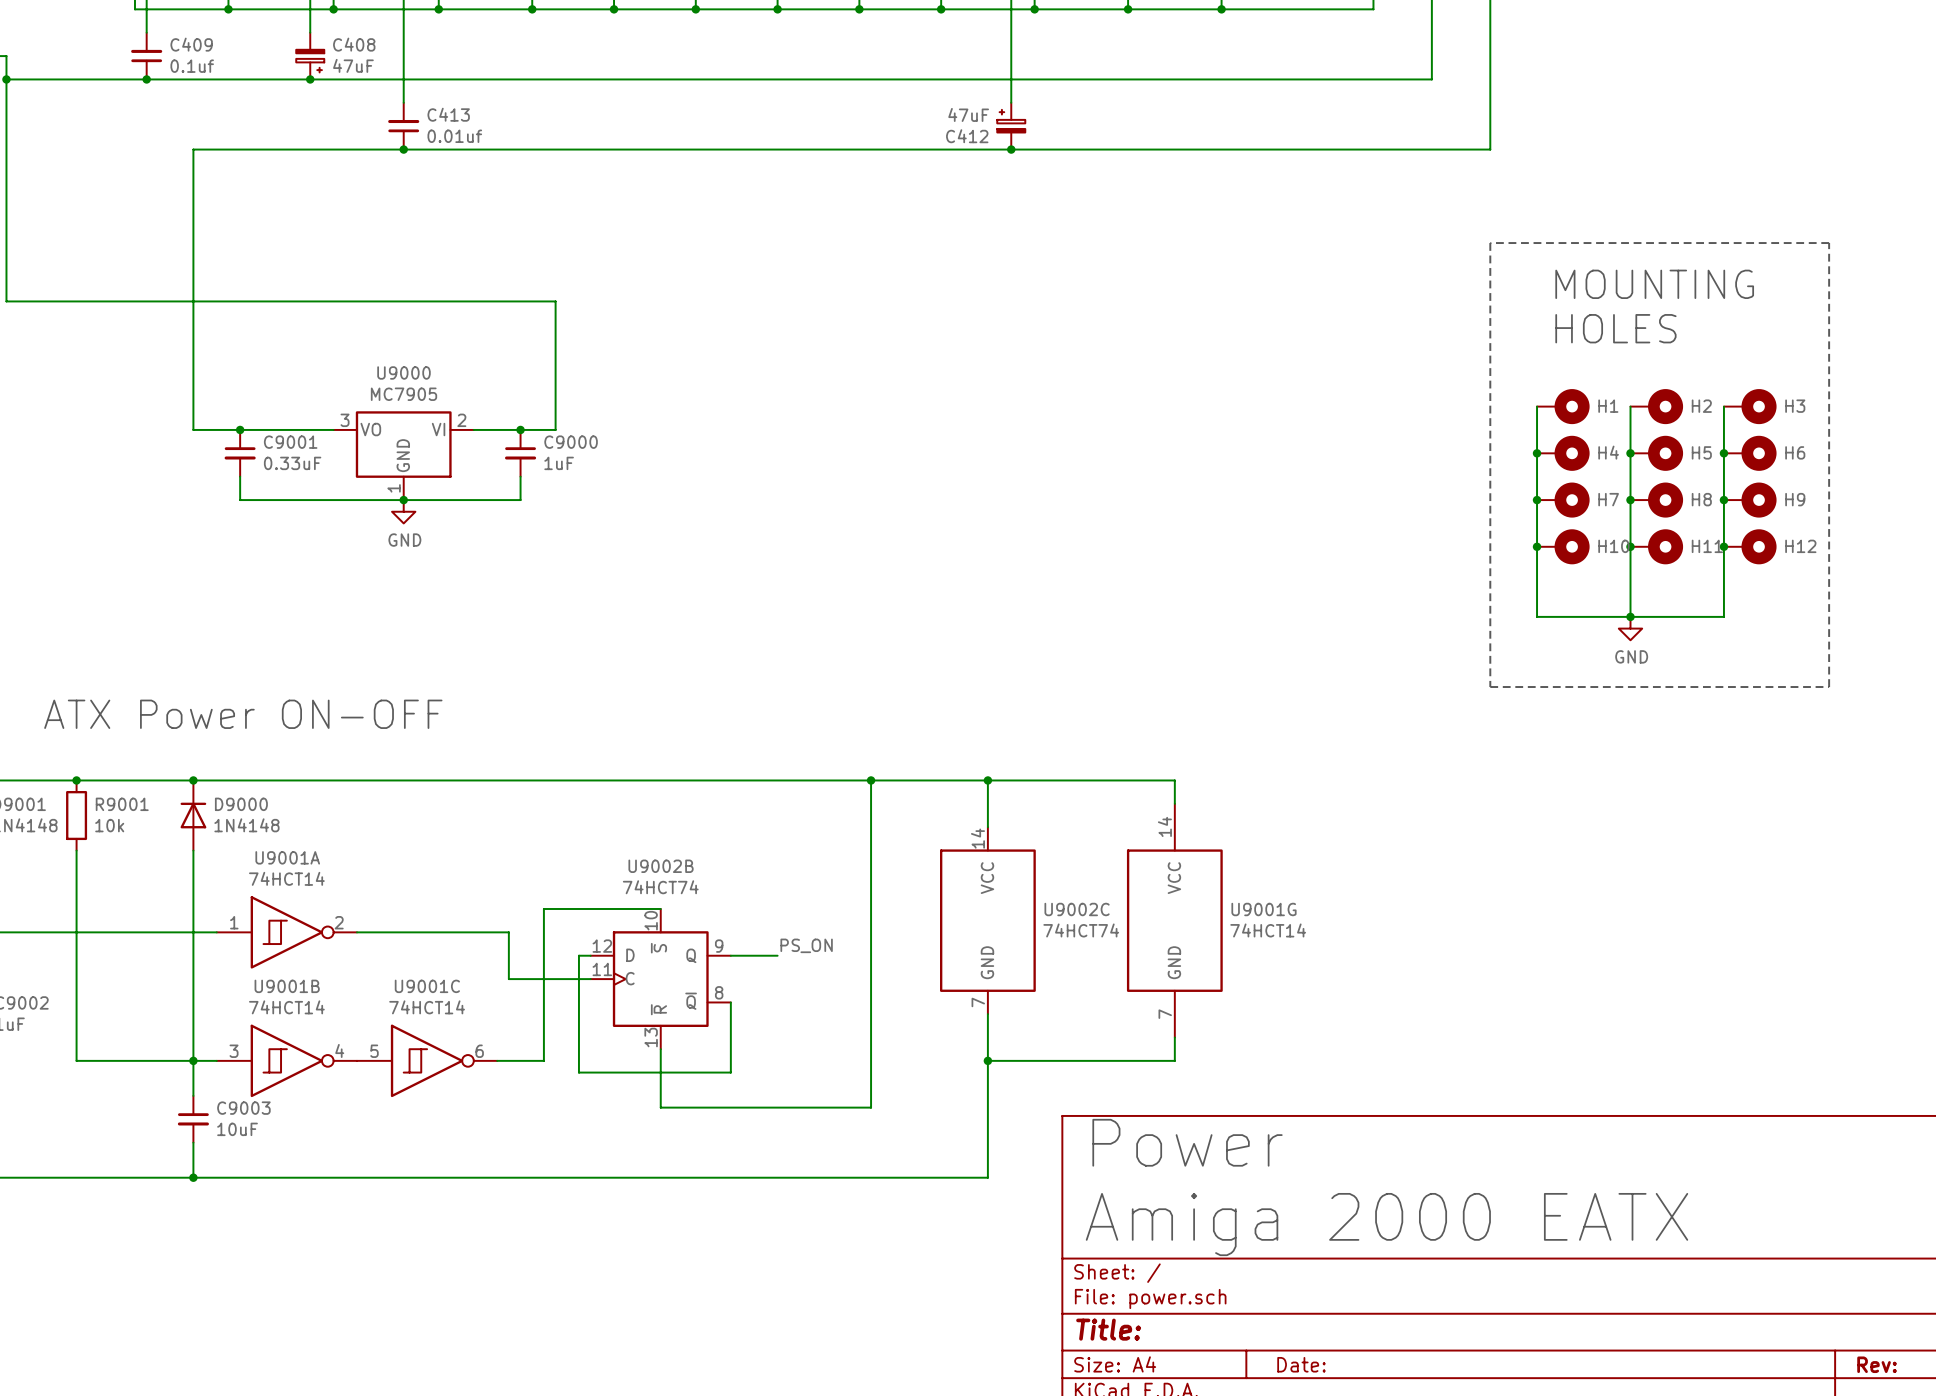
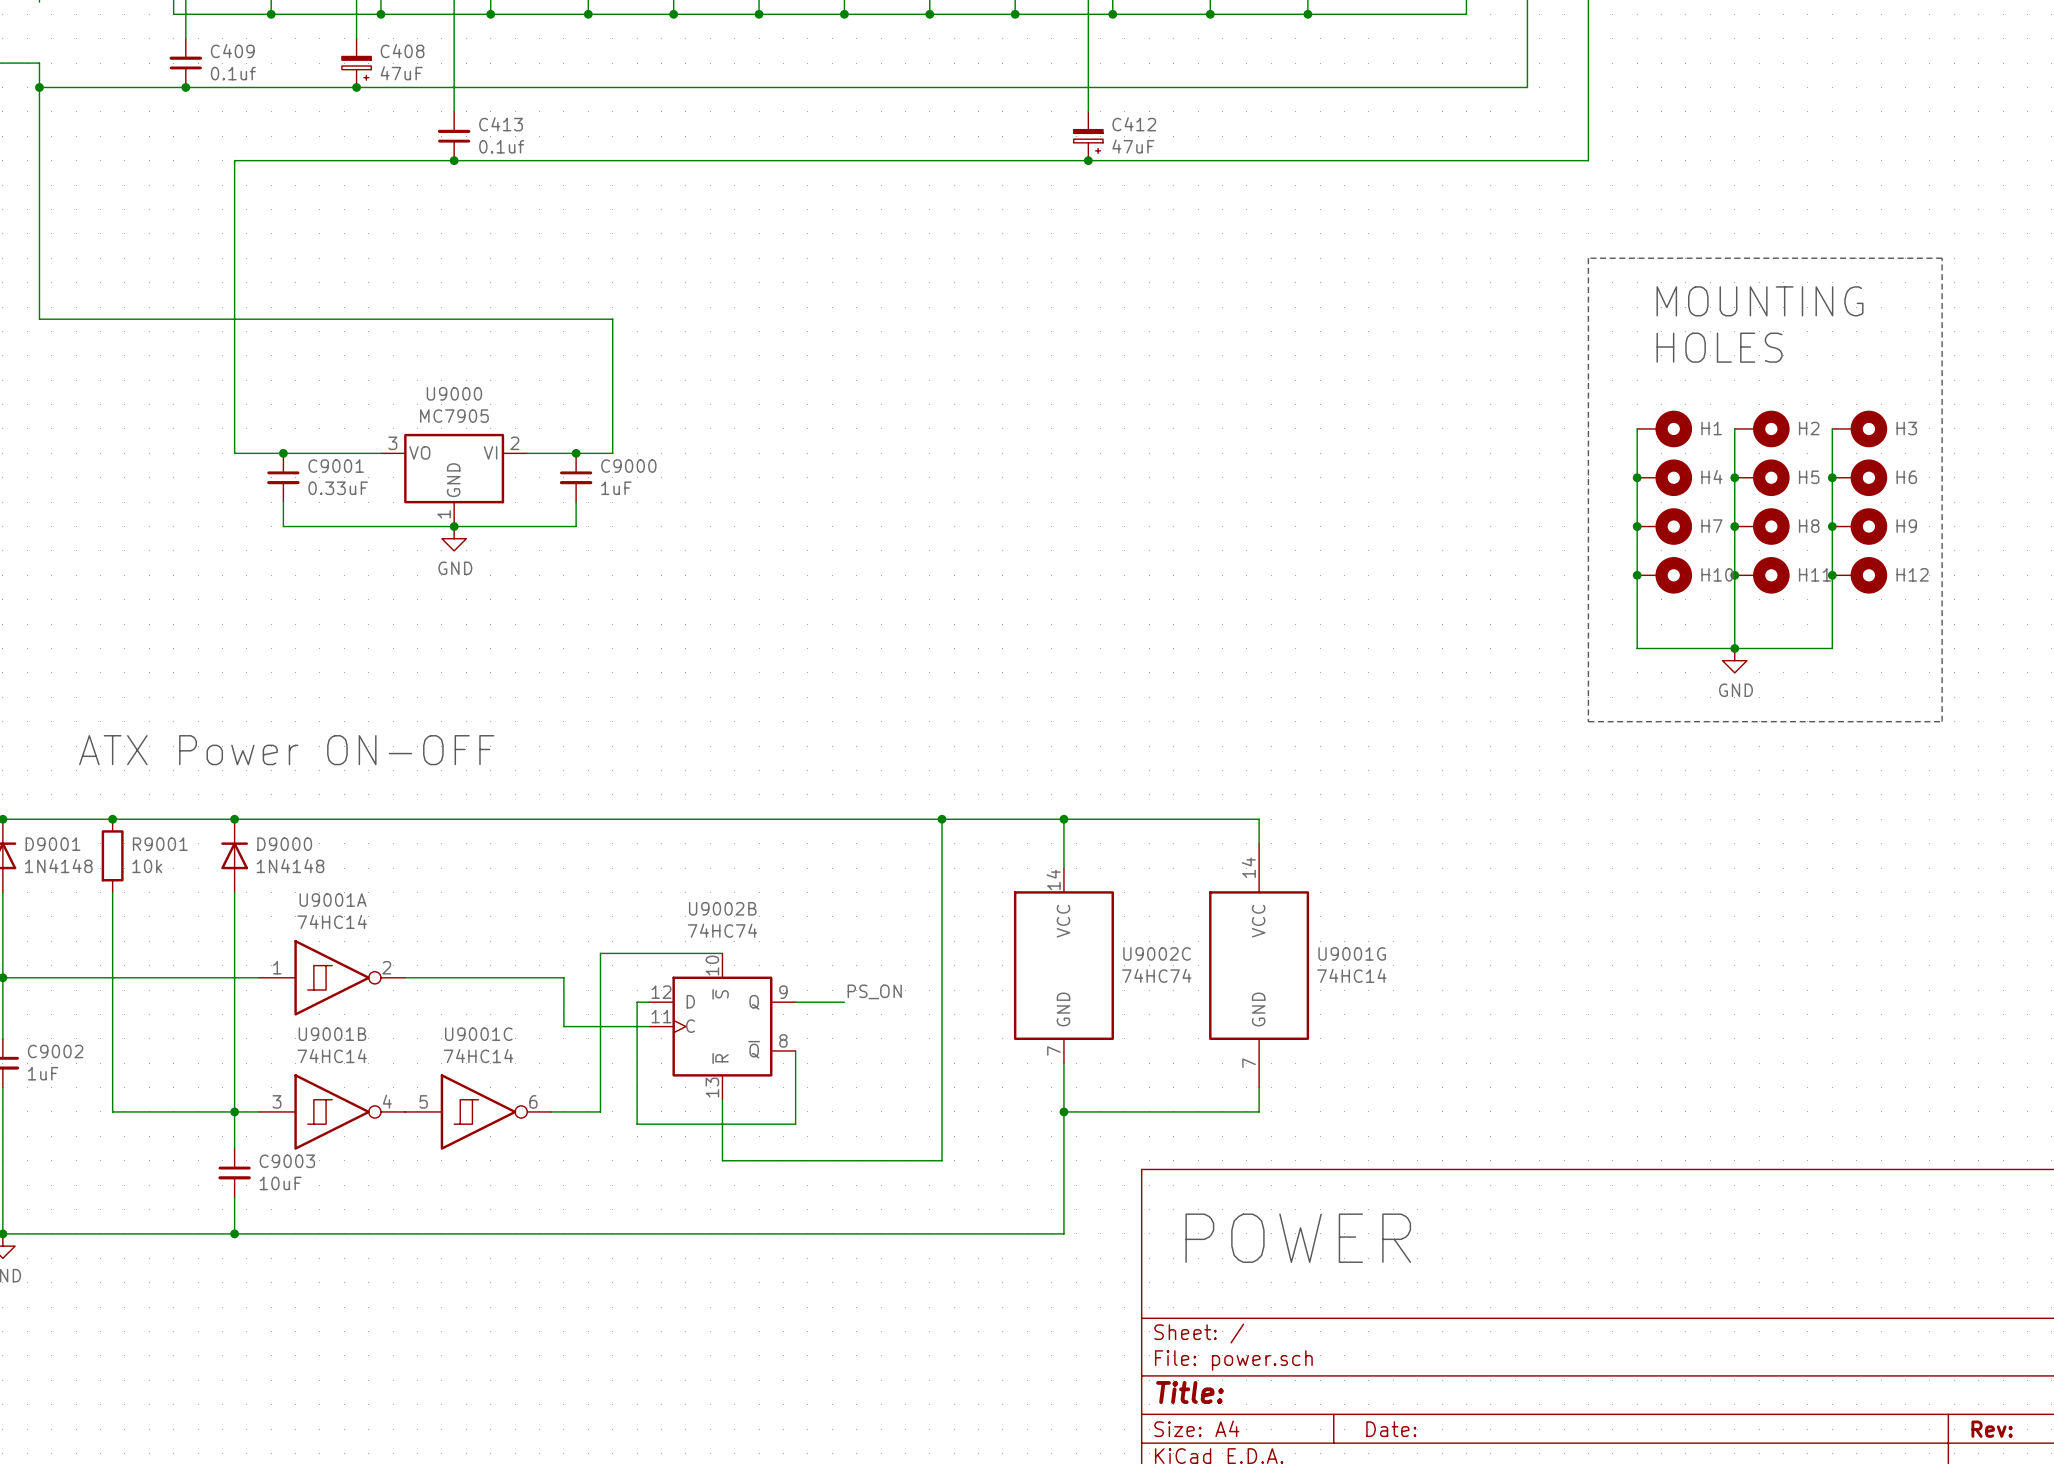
C412 rotation: 0° (1011, 121) -> 180° (1088, 141)
C413 value: 0.01uf (454, 136) -> 0.1uf (501, 146)
U9001A value: 74HCT14 (286, 878) -> 74HC14 (332, 921)
U9002B value: 74HCT74 (660, 887) -> 74HC74 (722, 930)
U9002C value: 74HCT74 (1081, 930) -> 74HC74 (1156, 975)
U9001G value: 74HCT14 (1268, 930) -> 74HC14 (1351, 975)
U9001B value: 74HCT14 (286, 1007) -> 74HC14 (332, 1056)
U9001C value: 74HCT14 (427, 1007) -> 74HC14 (478, 1056)
text: Power (1187, 1142) -> none
text: none -> POWER (1298, 1238)
text: Amiga 2000 EATX (1386, 1224) -> none

